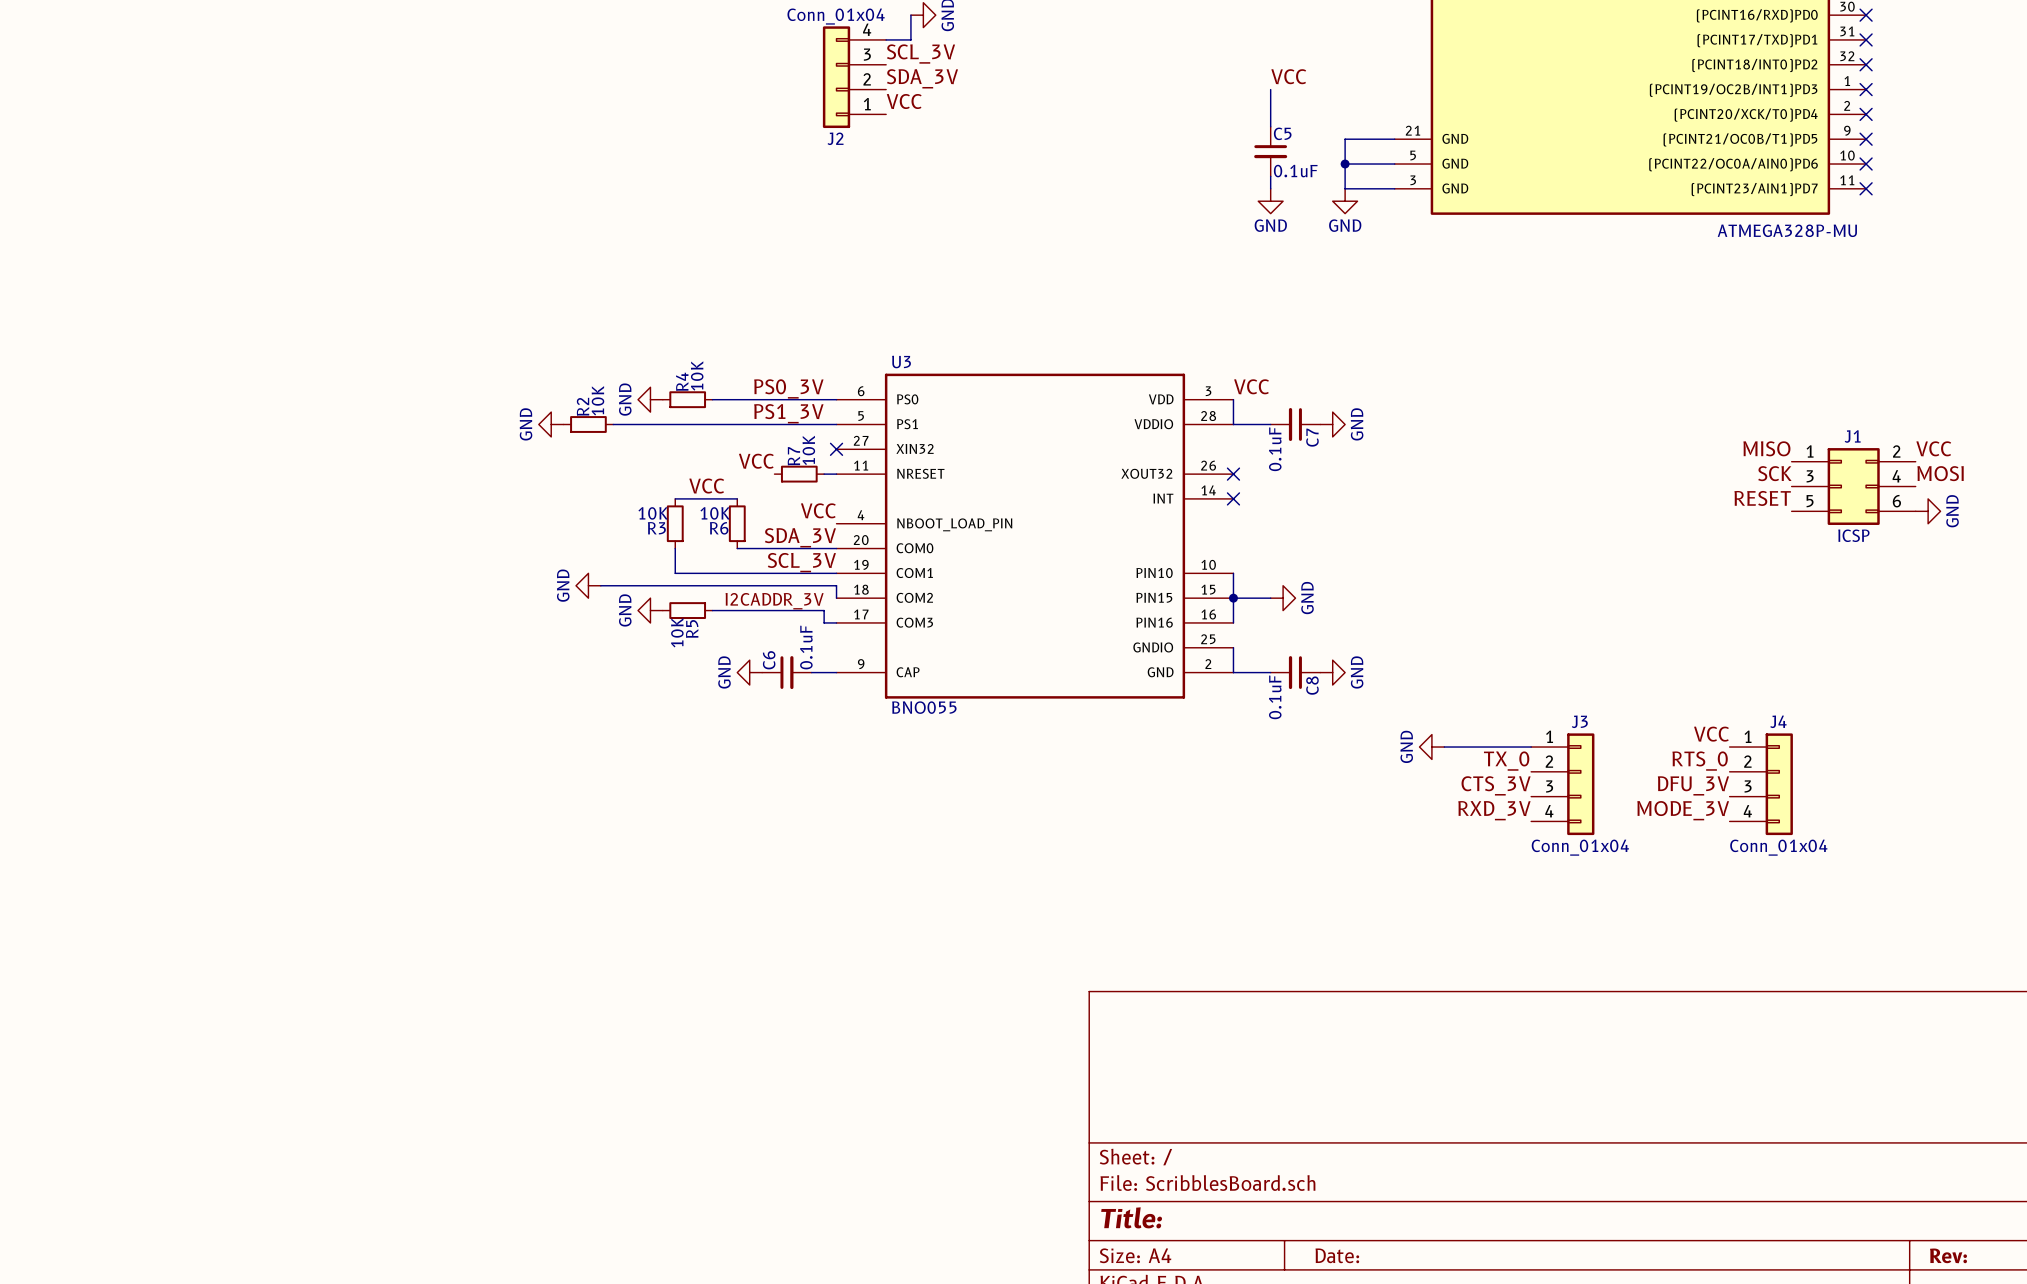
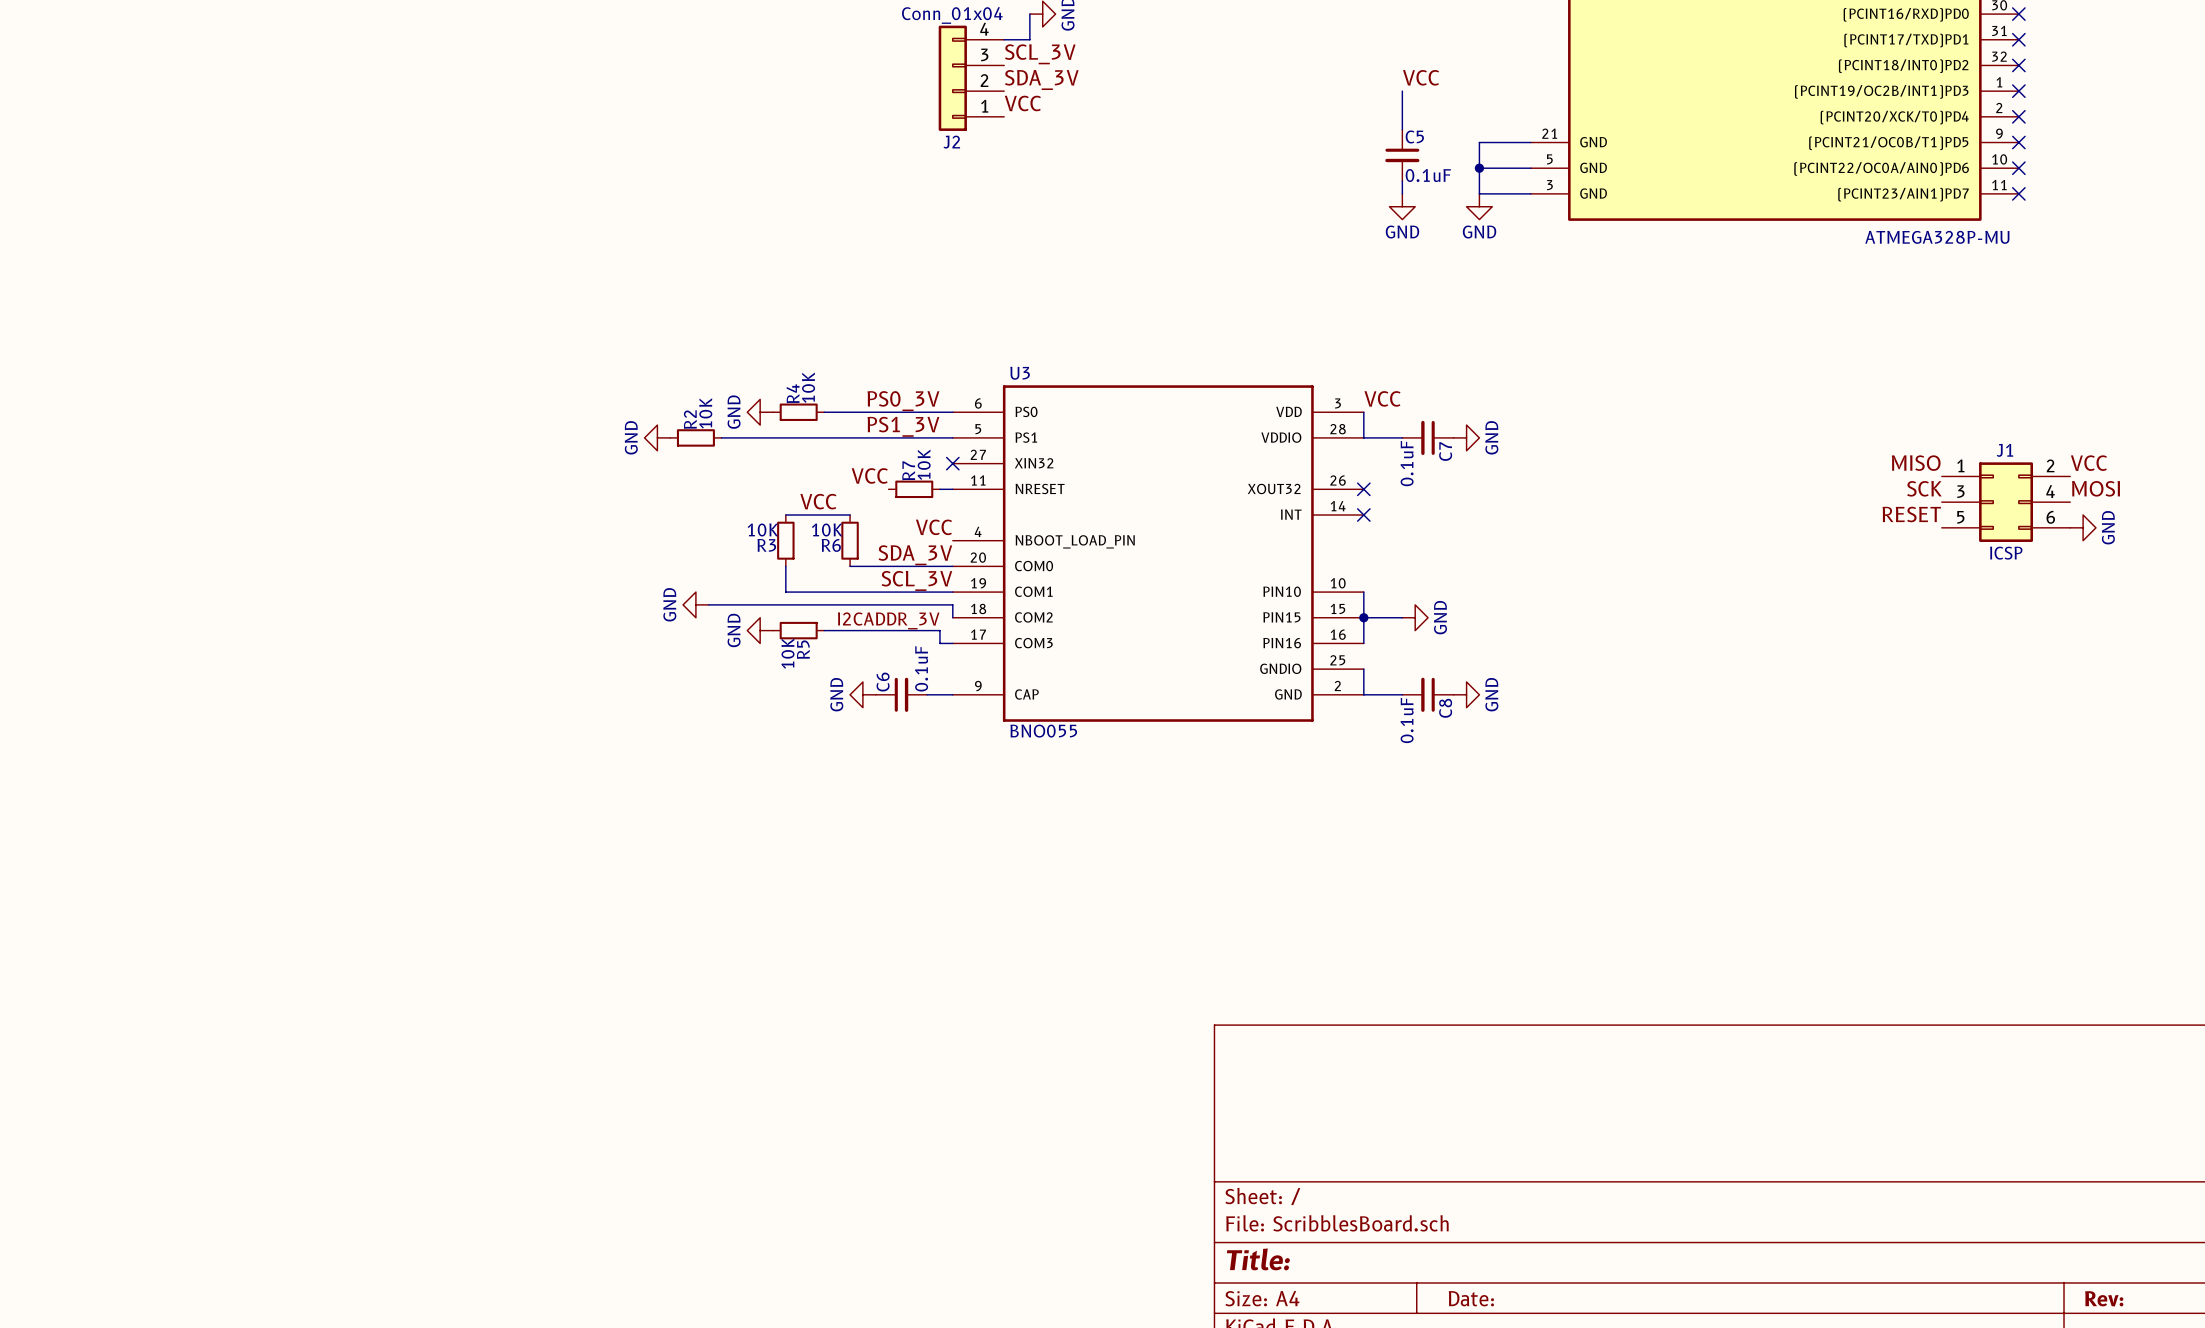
label: VCC (1711, 734) -> none
power symbol: GND (1431, 747) -> none
wire: (1444, 747) (1531, 747) -> none
label: TX_0 (1506, 761) -> none
label: RTS_0 (1700, 761) -> none
J3: Conn_01x04 (1562, 784) -> none
J4: Conn_01x04 (1761, 784) -> none
label: CTS_3V (1496, 785) -> none
label: DFU_3V (1693, 785) -> none
label: RXD_3V (1494, 810) -> none
label: MODE_3V (1683, 810) -> none

